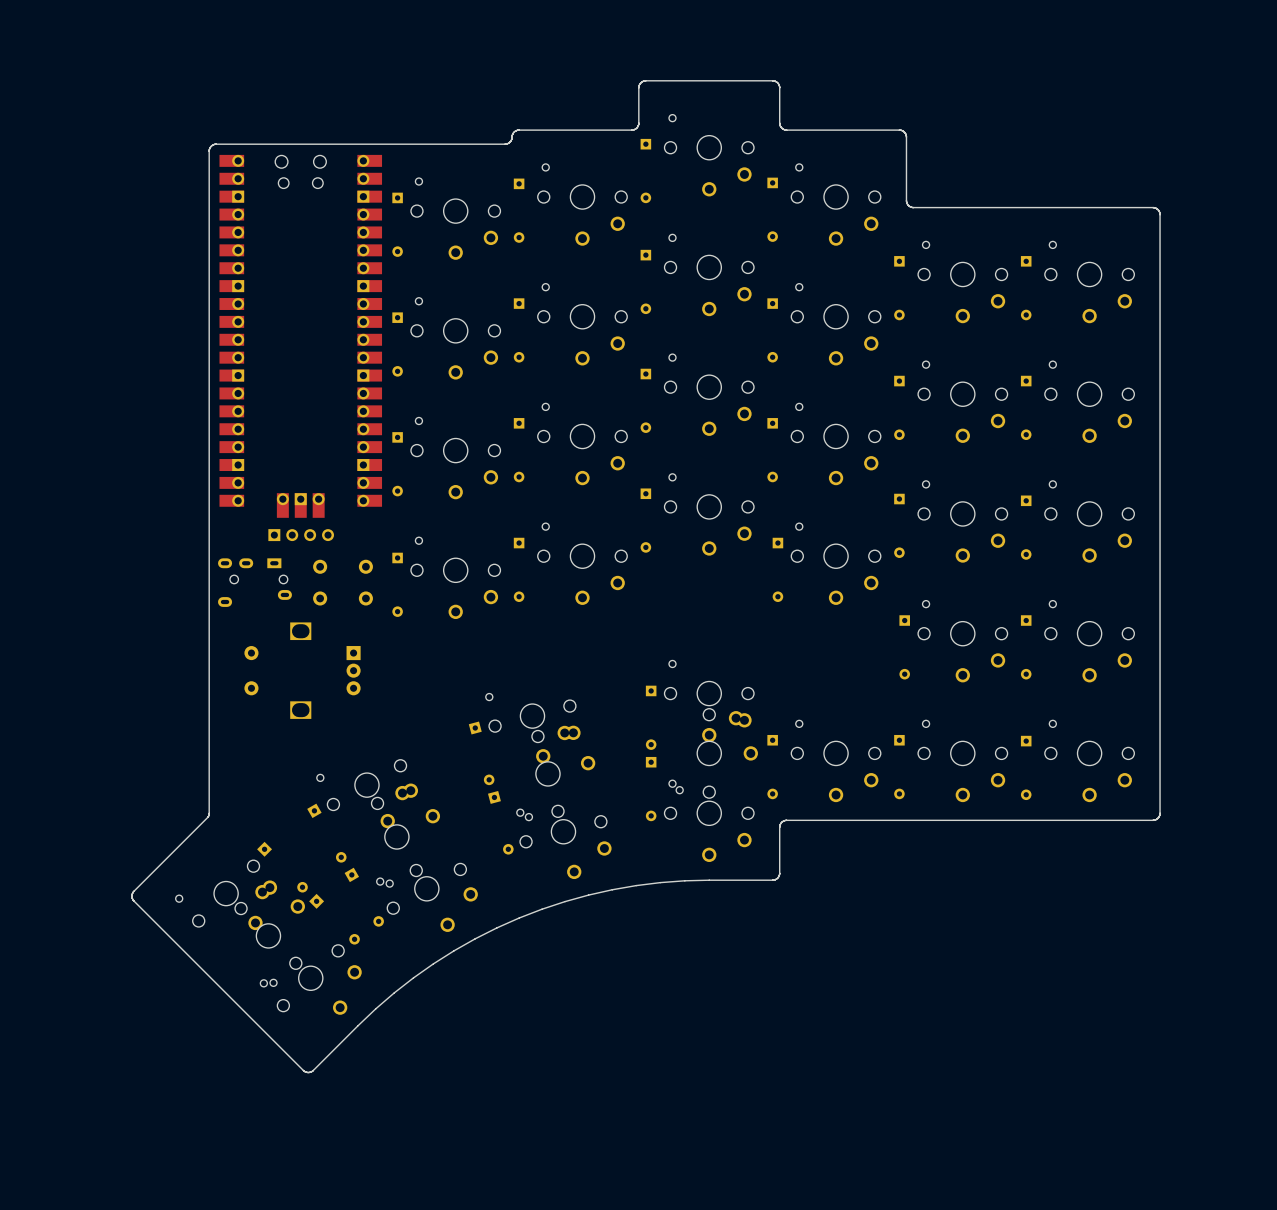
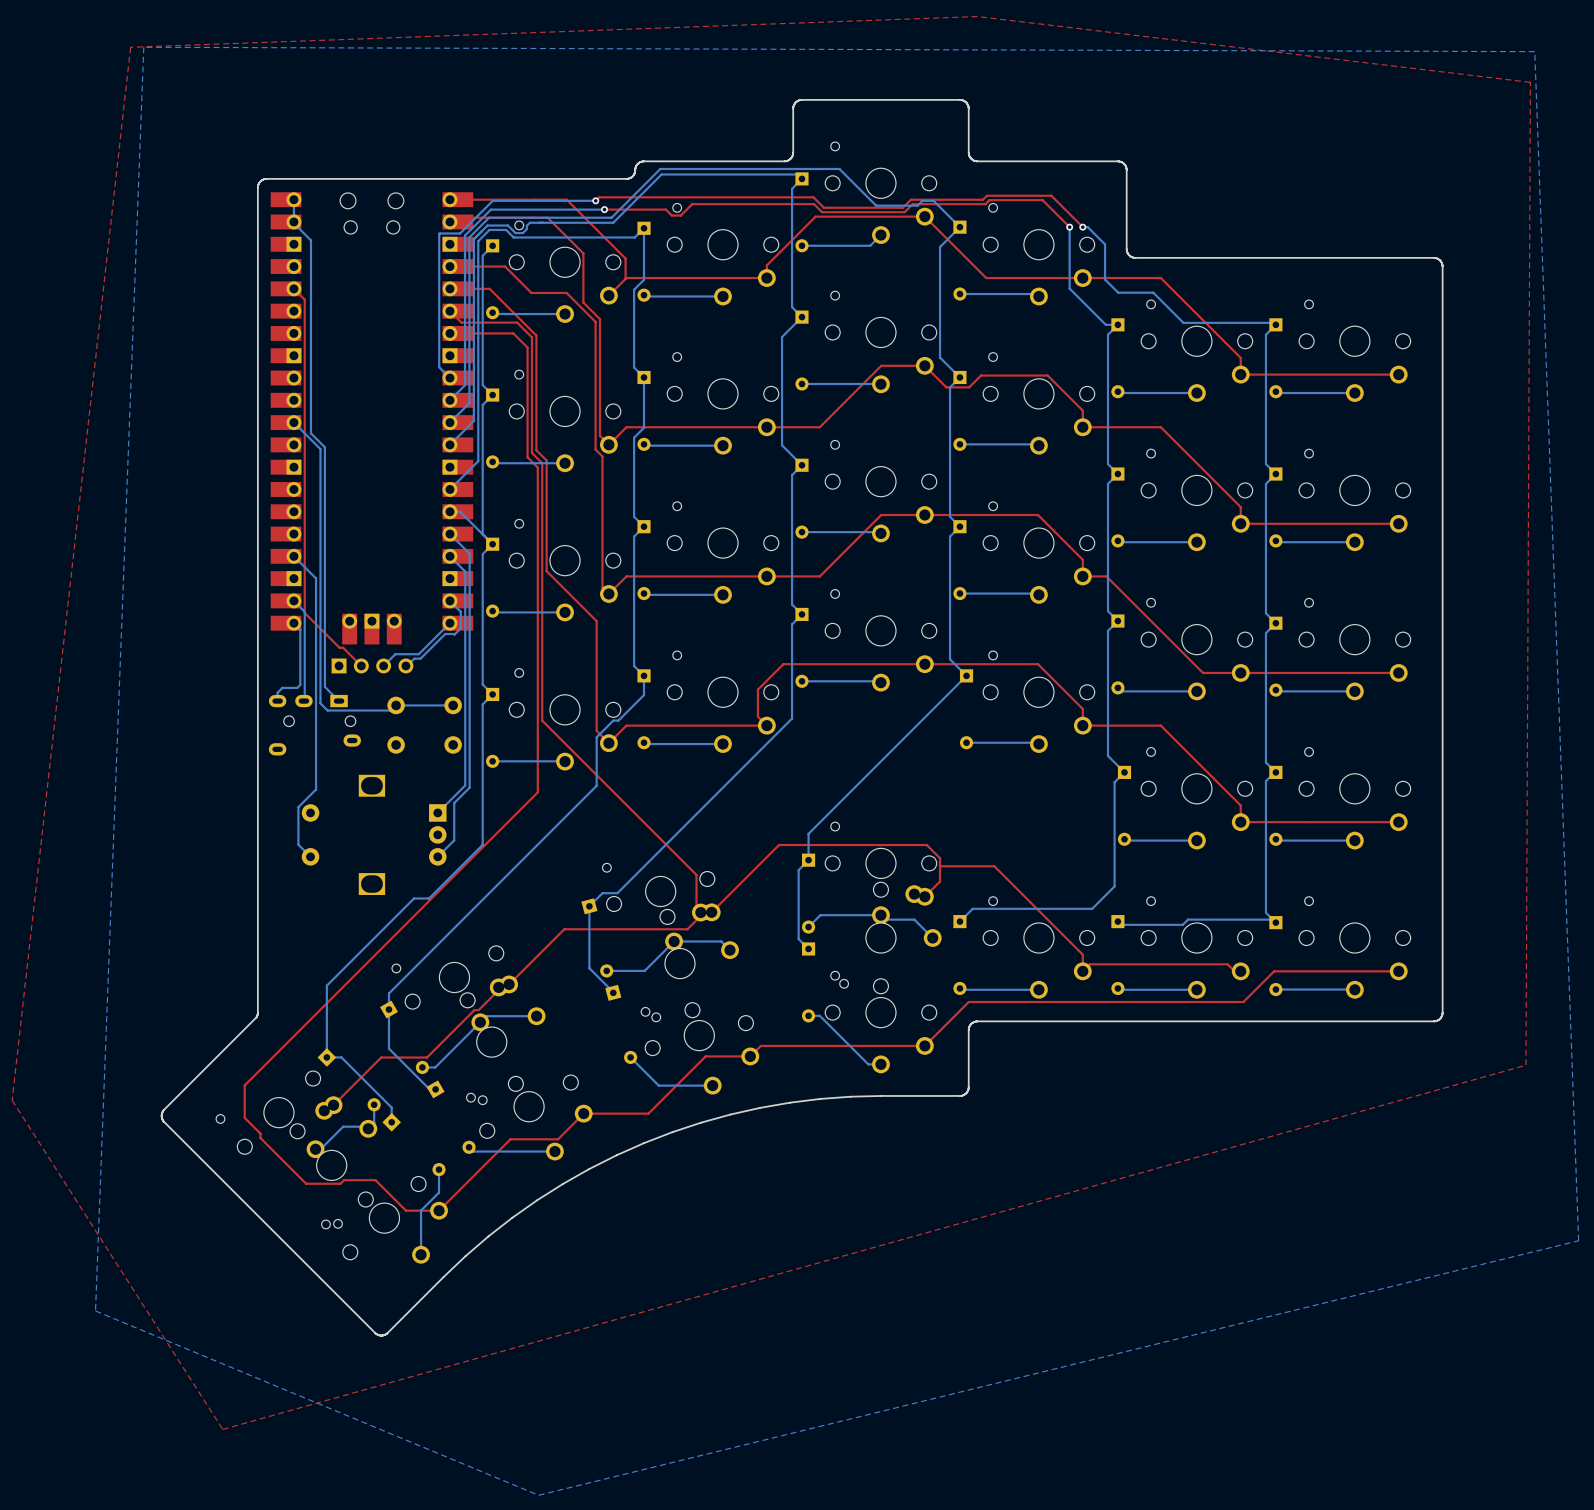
top zone outline: none -> (977, 16) (1530, 82) (1525, 1065) (222, 1429) (12, 1100) (130, 47) (977, 16)
bottom zone outline: none -> (143, 47) (1534, 51) (1578, 1240) (538, 1495) (95, 1310) (143, 47)
bottom track: none -> (293, 199) (293, 223) (310, 240) (310, 433) (324, 447) (324, 686) (339, 701)
top track: none -> (449, 199) (566, 199) (625, 258) (625, 278)
bottom track: none -> (595, 200) (492, 200) (460, 233) (439, 234) (439, 367) (449, 378)
top track: none -> (595, 200) (599, 197) (813, 197) (823, 207) (902, 207) (910, 199) (982, 199) (986, 195) (1051, 195) (1082, 227)
via: none -> (595, 200)
bottom track: none -> (604, 209) (490, 209) (465, 235) (465, 385) (449, 400)
top track: none -> (604, 209) (665, 209) (671, 215) (680, 215) (692, 204) (814, 204) (822, 212) (904, 212) (912, 204) (985, 204) (989, 200) (1042, 200) (1069, 227)
via: none -> (604, 209)
top track: none -> (449, 221) (454, 217) (547, 217) (583, 253) (583, 302) (599, 319) (599, 435) (608, 444) (626, 427) (819, 427) (881, 365) (924, 365) (946, 387) (969, 387) (981, 375) (1047, 375) (1082, 410) (1082, 427) (1160, 427) (1240, 507) (1240, 523) (1398, 523)
bottom track: none -> (1069, 227) (1069, 288) (1105, 324) (1117, 324) (1108, 334) (1108, 464) (1117, 474) (1108, 483) (1108, 611) (1117, 621) (1108, 630) (1108, 755) (1124, 772) (1114, 782) (1114, 886) (1092, 908) (972, 908) (959, 921)
via: none -> (1069, 227)
bottom track: none -> (1082, 227) (1087, 227) (1105, 244) (1105, 279) (1118, 292) (1153, 292) (1183, 322) (1273, 322) (1275, 324) (1265, 334) (1265, 464) (1275, 474) (1265, 483) (1265, 613) (1275, 623) (1265, 633) (1265, 762) (1275, 772) (1265, 781) (1265, 912) (1275, 922)
via: none -> (1082, 227)
bottom track: none -> (644, 228) (644, 279) (634, 289) (634, 367) (644, 377) (644, 427) (634, 437) (634, 516) (644, 526) (634, 536) (634, 665) (644, 675) (644, 695) (618, 720) (613, 720) (596, 737) (596, 785) (388, 993) (388, 1048) (429, 1089) (435, 1089)
bottom track: none -> (644, 228) (634, 237) (513, 237) (506, 229) (489, 229) (478, 241) (478, 461) (449, 489)
bottom track: none -> (880, 235) (870, 245) (801, 245)
bottom track: none -> (492, 245) (482, 255) (482, 385) (492, 395) (482, 404) (482, 534)
top track: none -> (449, 266) (505, 266) (531, 292) (566, 292) (595, 321) (595, 449) (602, 456) (602, 587) (608, 593) (626, 576) (819, 576) (881, 515) (1038, 515) (1082, 559) (1082, 576) (1106, 576) (1203, 672) (1398, 672)
top track: none -> (293, 288) (304, 299) (304, 612) (339, 647) (343, 647) (361, 665)
top track: none -> (449, 288) (489, 288) (536, 335) (536, 450) (546, 460) (546, 571) (596, 621) (596, 730) (608, 743) (626, 725) (766, 725) (757, 716) (757, 689) (783, 664) (1038, 664) (1082, 708) (1082, 725) (1160, 725) (1240, 805) (1240, 822) (1398, 822)
bottom track: none -> (959, 294) (1036, 294) (1038, 296)
top track: none -> (608, 295) (626, 278) (766, 278) (766, 265) (815, 216) (924, 216) (986, 278) (1160, 278) (1240, 357) (1240, 374) (1398, 374)
bottom track: none -> (644, 295) (723, 296)
top track: none -> (449, 311) (461, 322) (517, 322) (531, 337) (531, 452) (542, 463) (542, 720) (696, 874) (696, 908) (700, 912)
bottom track: none -> (492, 312) (565, 314)
top track: none -> (449, 333) (513, 333) (527, 347) (527, 457) (537, 467) (537, 792) (244, 1085) (244, 1117) (260, 1133) (260, 1138) (306, 1183) (340, 1183) (344, 1180) (375, 1180) (406, 1210) (439, 1210) (510, 1139) (558, 1139) (583, 1113) (648, 1113) (705, 1056) (750, 1056) (760, 1045) (924, 1045) (968, 1002) (1243, 1002) (1274, 971) (1398, 971)
bottom track: none -> (801, 383) (880, 384)
bottom track: none -> (1117, 391) (1196, 393)
bottom track: none -> (1275, 391) (1354, 393)
bottom track: none -> (293, 422) (320, 449) (320, 703) (327, 710) (391, 710) (396, 705) (453, 705)
bottom track: none -> (449, 422) (469, 403) (469, 237) (489, 217) (611, 217) (660, 168) (839, 168) (876, 205) (917, 205) (922, 200) (933, 200) (959, 227) (940, 247) (940, 357) (959, 377) (950, 387) (950, 516) (959, 526) (950, 536) (950, 659) (966, 675) (808, 833) (808, 860) (798, 870) (798, 939) (808, 948)
bottom track: none -> (449, 444) (473, 420) (473, 239) (487, 225) (507, 225) (515, 233) (522, 233) (529, 222) (613, 222) (661, 174) (797, 174) (801, 178) (792, 188) (792, 307) (801, 317) (782, 337) (782, 445) (801, 465) (792, 475) (792, 604) (801, 614) (792, 624) (792, 718) (617, 893) (602, 893) (589, 906) (589, 968) (613, 992)
bottom track: none -> (644, 444) (723, 445)
bottom track: none -> (959, 444) (1038, 445)
bottom track: none -> (492, 461) (565, 463)
bottom track: none -> (449, 511) (460, 511) (492, 544) (482, 554) (482, 684) (492, 694) (482, 704) (482, 844) (429, 898) (414, 898) (326, 985) (326, 1057) (341, 1057) (391, 1107) (391, 1122)
bottom track: none -> (801, 532) (880, 533)
bottom track: none -> (449, 534) (469, 553) (469, 787) (454, 803) (454, 840) (437, 856)
bottom track: none -> (1117, 540) (1196, 542)
bottom track: none -> (1275, 540) (1354, 542)
bottom track: none -> (293, 556) (316, 578) (316, 789) (298, 807) (298, 844) (310, 856)
bottom track: none -> (449, 556) (465, 571) (465, 785) (437, 812)
bottom track: none -> (644, 593) (723, 594)
bottom track: none -> (959, 593) (1038, 594)
bottom track: none -> (293, 600) (304, 611) (303, 701)
bottom track: none -> (449, 600) (460, 611) (460, 628) (454, 634) (445, 634) (420, 658) (414, 658) (405, 665)
bottom track: none -> (492, 611) (565, 612)
bottom track: none -> (293, 623) (300, 629) (300, 684) (297, 687) (282, 687) (277, 692) (277, 701)
bottom track: none -> (449, 623) (418, 654) (395, 654) (383, 665)
bottom track: none -> (801, 681) (880, 682)
bottom track: none -> (1117, 687) (1121, 691) (1196, 691)
bottom track: none -> (1275, 690) (1354, 691)
bottom track: none -> (644, 742) (723, 744)
bottom track: none -> (966, 742) (1038, 744)
bottom track: none -> (492, 761) (565, 761)
bottom track: none -> (1124, 839) (1196, 840)
bottom track: none -> (1275, 839) (1354, 840)
top track: none -> (940, 866) (994, 866) (1082, 954) (1082, 971) (1089, 964) (1227, 964) (1234, 971) (1240, 971)
top track: none -> (914, 894) (922, 894) (924, 896) (940, 881) (940, 858) (926, 845) (779, 845) (711, 912) (700, 912)
top track: none -> (700, 912) (700, 915) (687, 929) (564, 929) (509, 984) (501, 984) (498, 987)
bottom track: none -> (1272, 919) (1188, 919) (1182, 924) (1117, 924) (1117, 921)
bottom track: none -> (808, 927) (820, 915) (880, 915) (884, 919) (914, 919) (932, 938)
bottom track: none -> (730, 950) (721, 941) (674, 941) (644, 970) (606, 970)
top track: none -> (498, 987) (498, 990) (478, 1010) (474, 1010) (427, 1057) (381, 1057) (333, 1105) (329, 1105) (324, 1110)
bottom track: none -> (959, 988) (1038, 989)
bottom track: none -> (1117, 988) (1196, 989)
bottom track: none -> (1275, 989) (1354, 989)
bottom track: none -> (808, 1015) (819, 1015) (868, 1064) (880, 1064) (880, 1060)
bottom track: none -> (536, 1016) (486, 1016) (435, 1067) (422, 1067)
bottom track: none -> (630, 1057) (658, 1085) (712, 1085)
bottom track: none -> (374, 1104) (374, 1122) (368, 1128)
bottom track: none -> (367, 1126) (343, 1126) (320, 1149) (315, 1149)
bottom track: none -> (469, 1147) (473, 1151) (554, 1151)
bottom track: none -> (438, 1169) (438, 1192) (421, 1210) (421, 1254)

